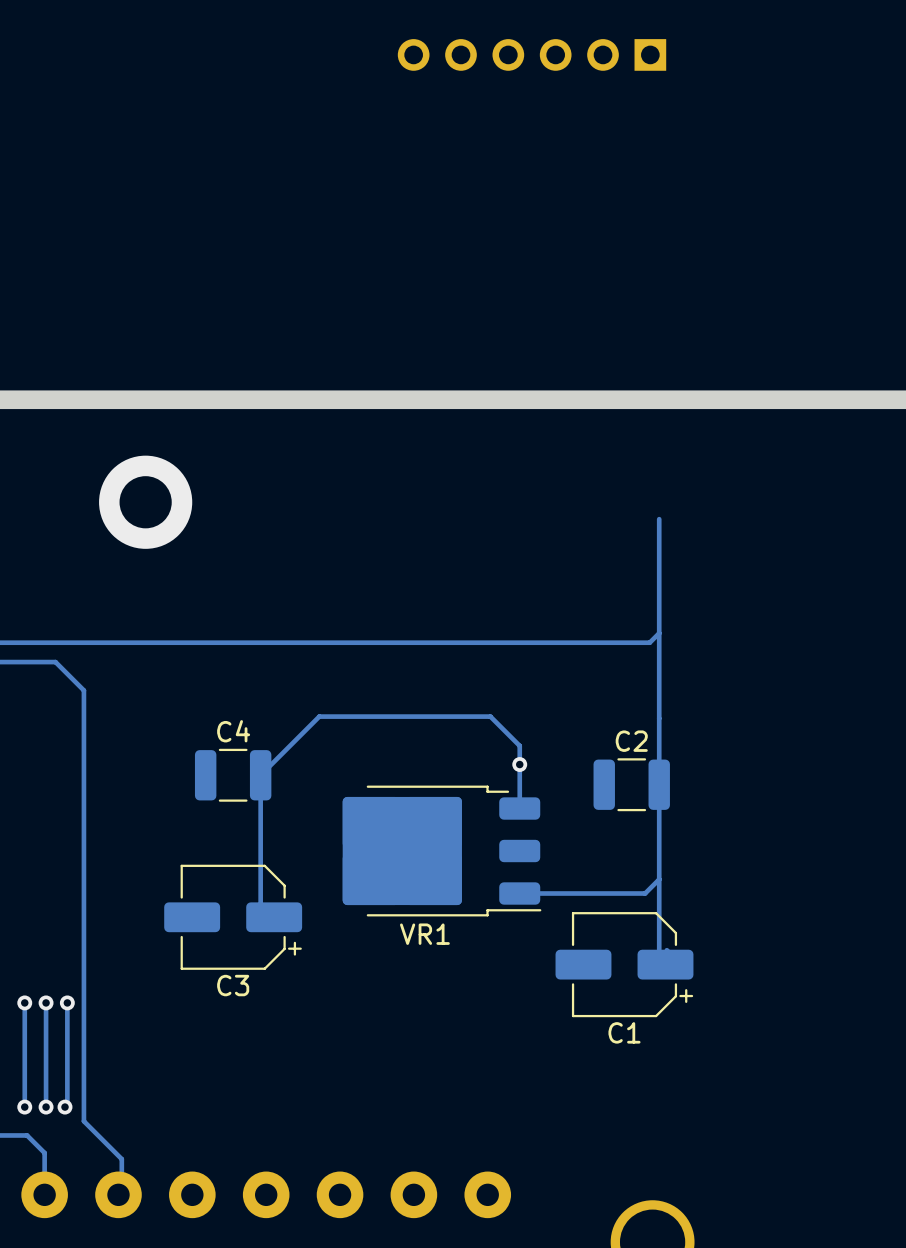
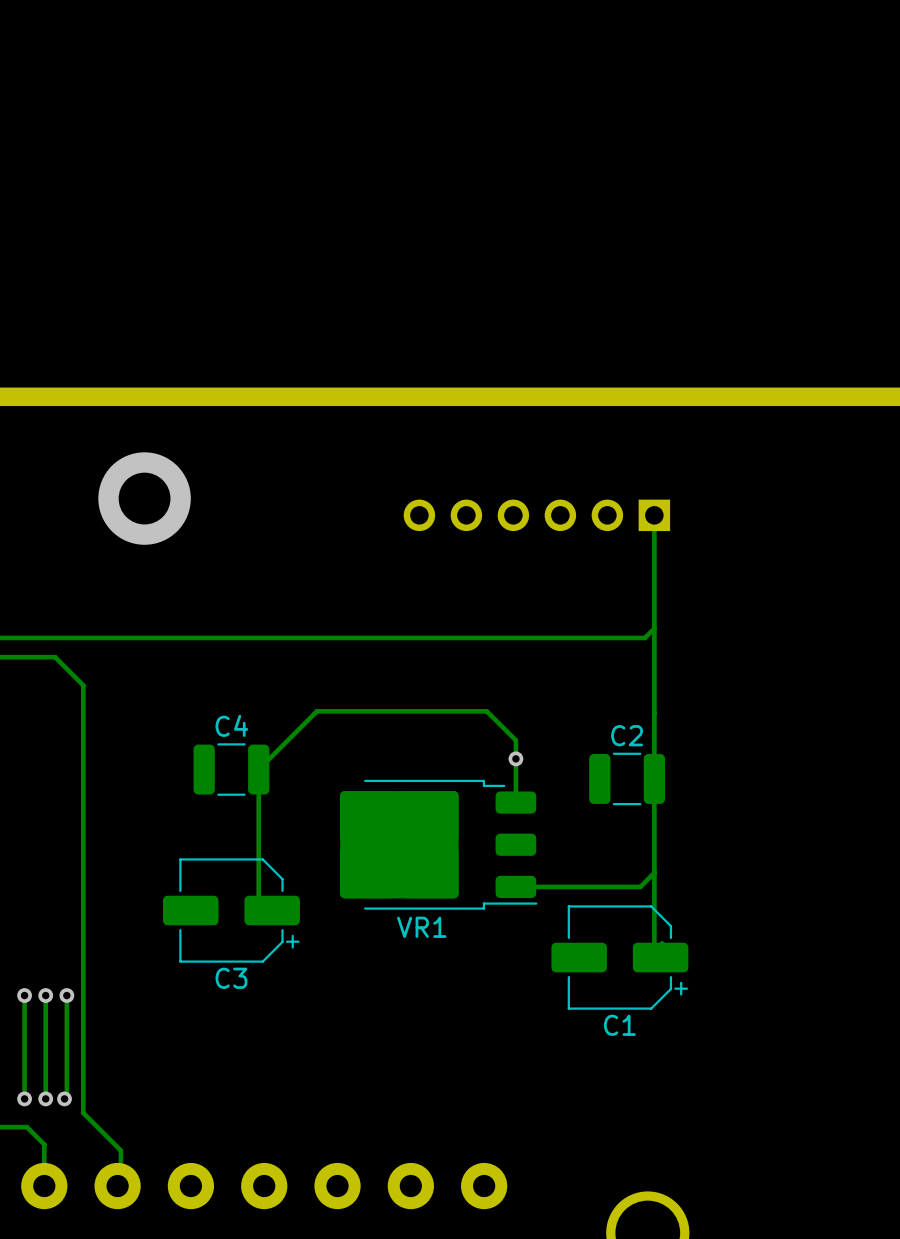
part position: (532, 54) -> (536, 515)

